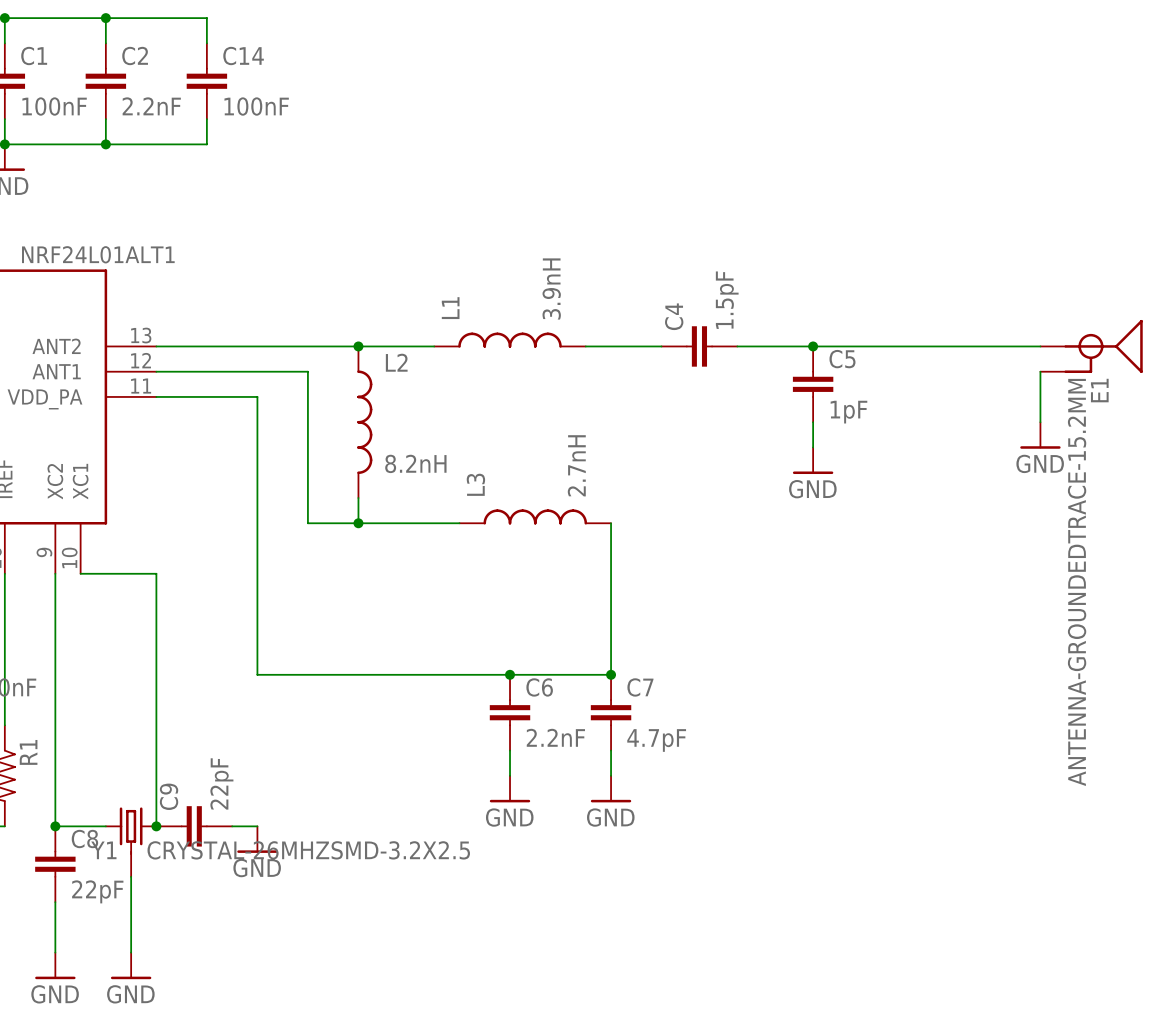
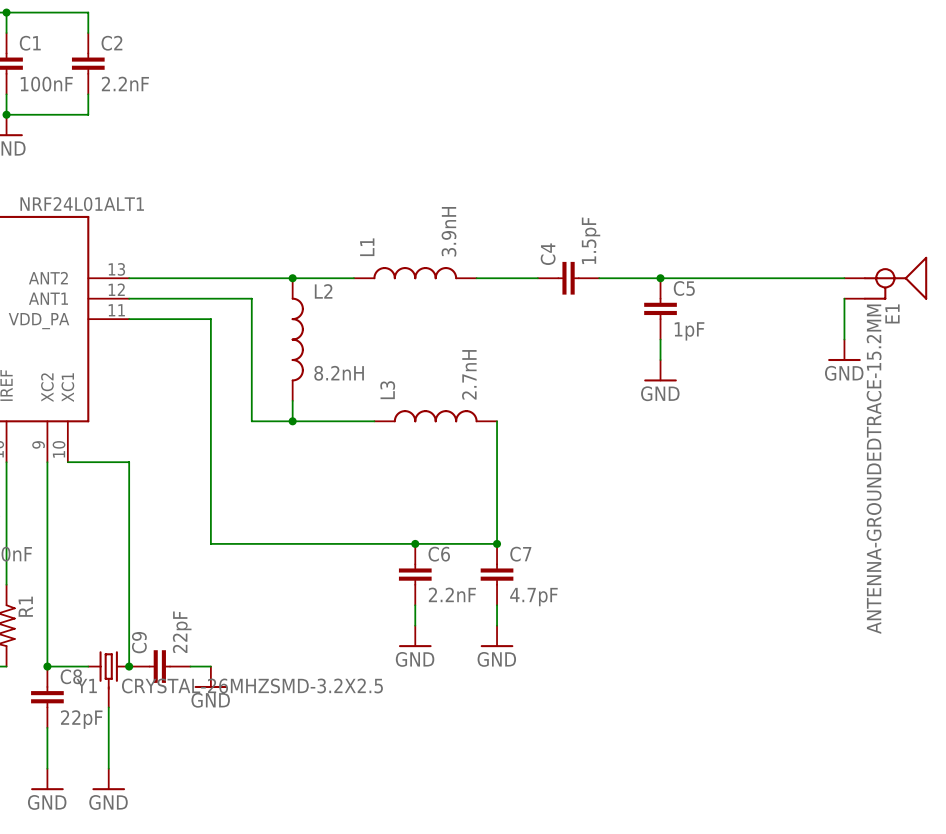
wire: (105, 18) (206, 18) (206, 43) -> none
junction: (105, 18) -> none
C14: 100nF (206, 81) -> none
wire: (206, 119) (206, 144) (105, 144) -> none
junction: (105, 144) -> none

